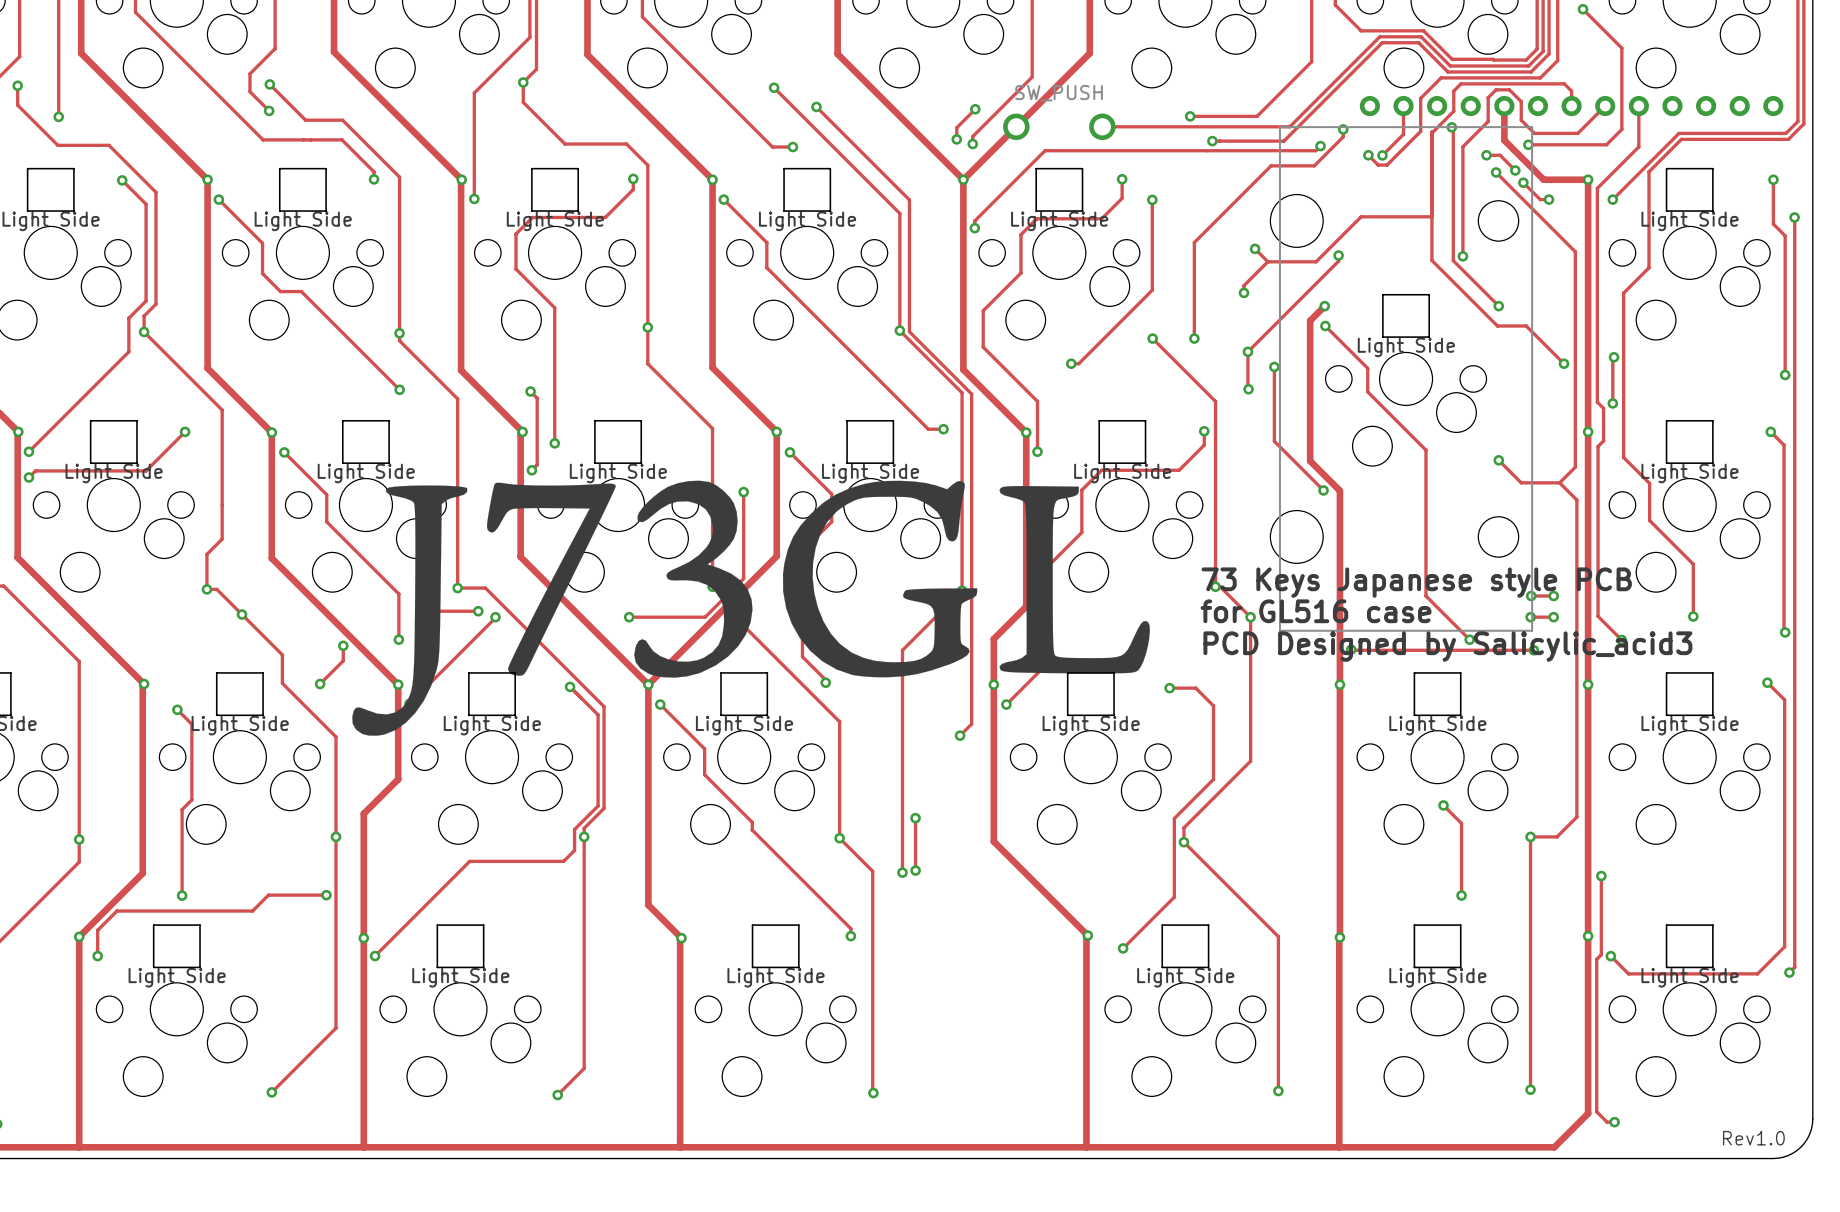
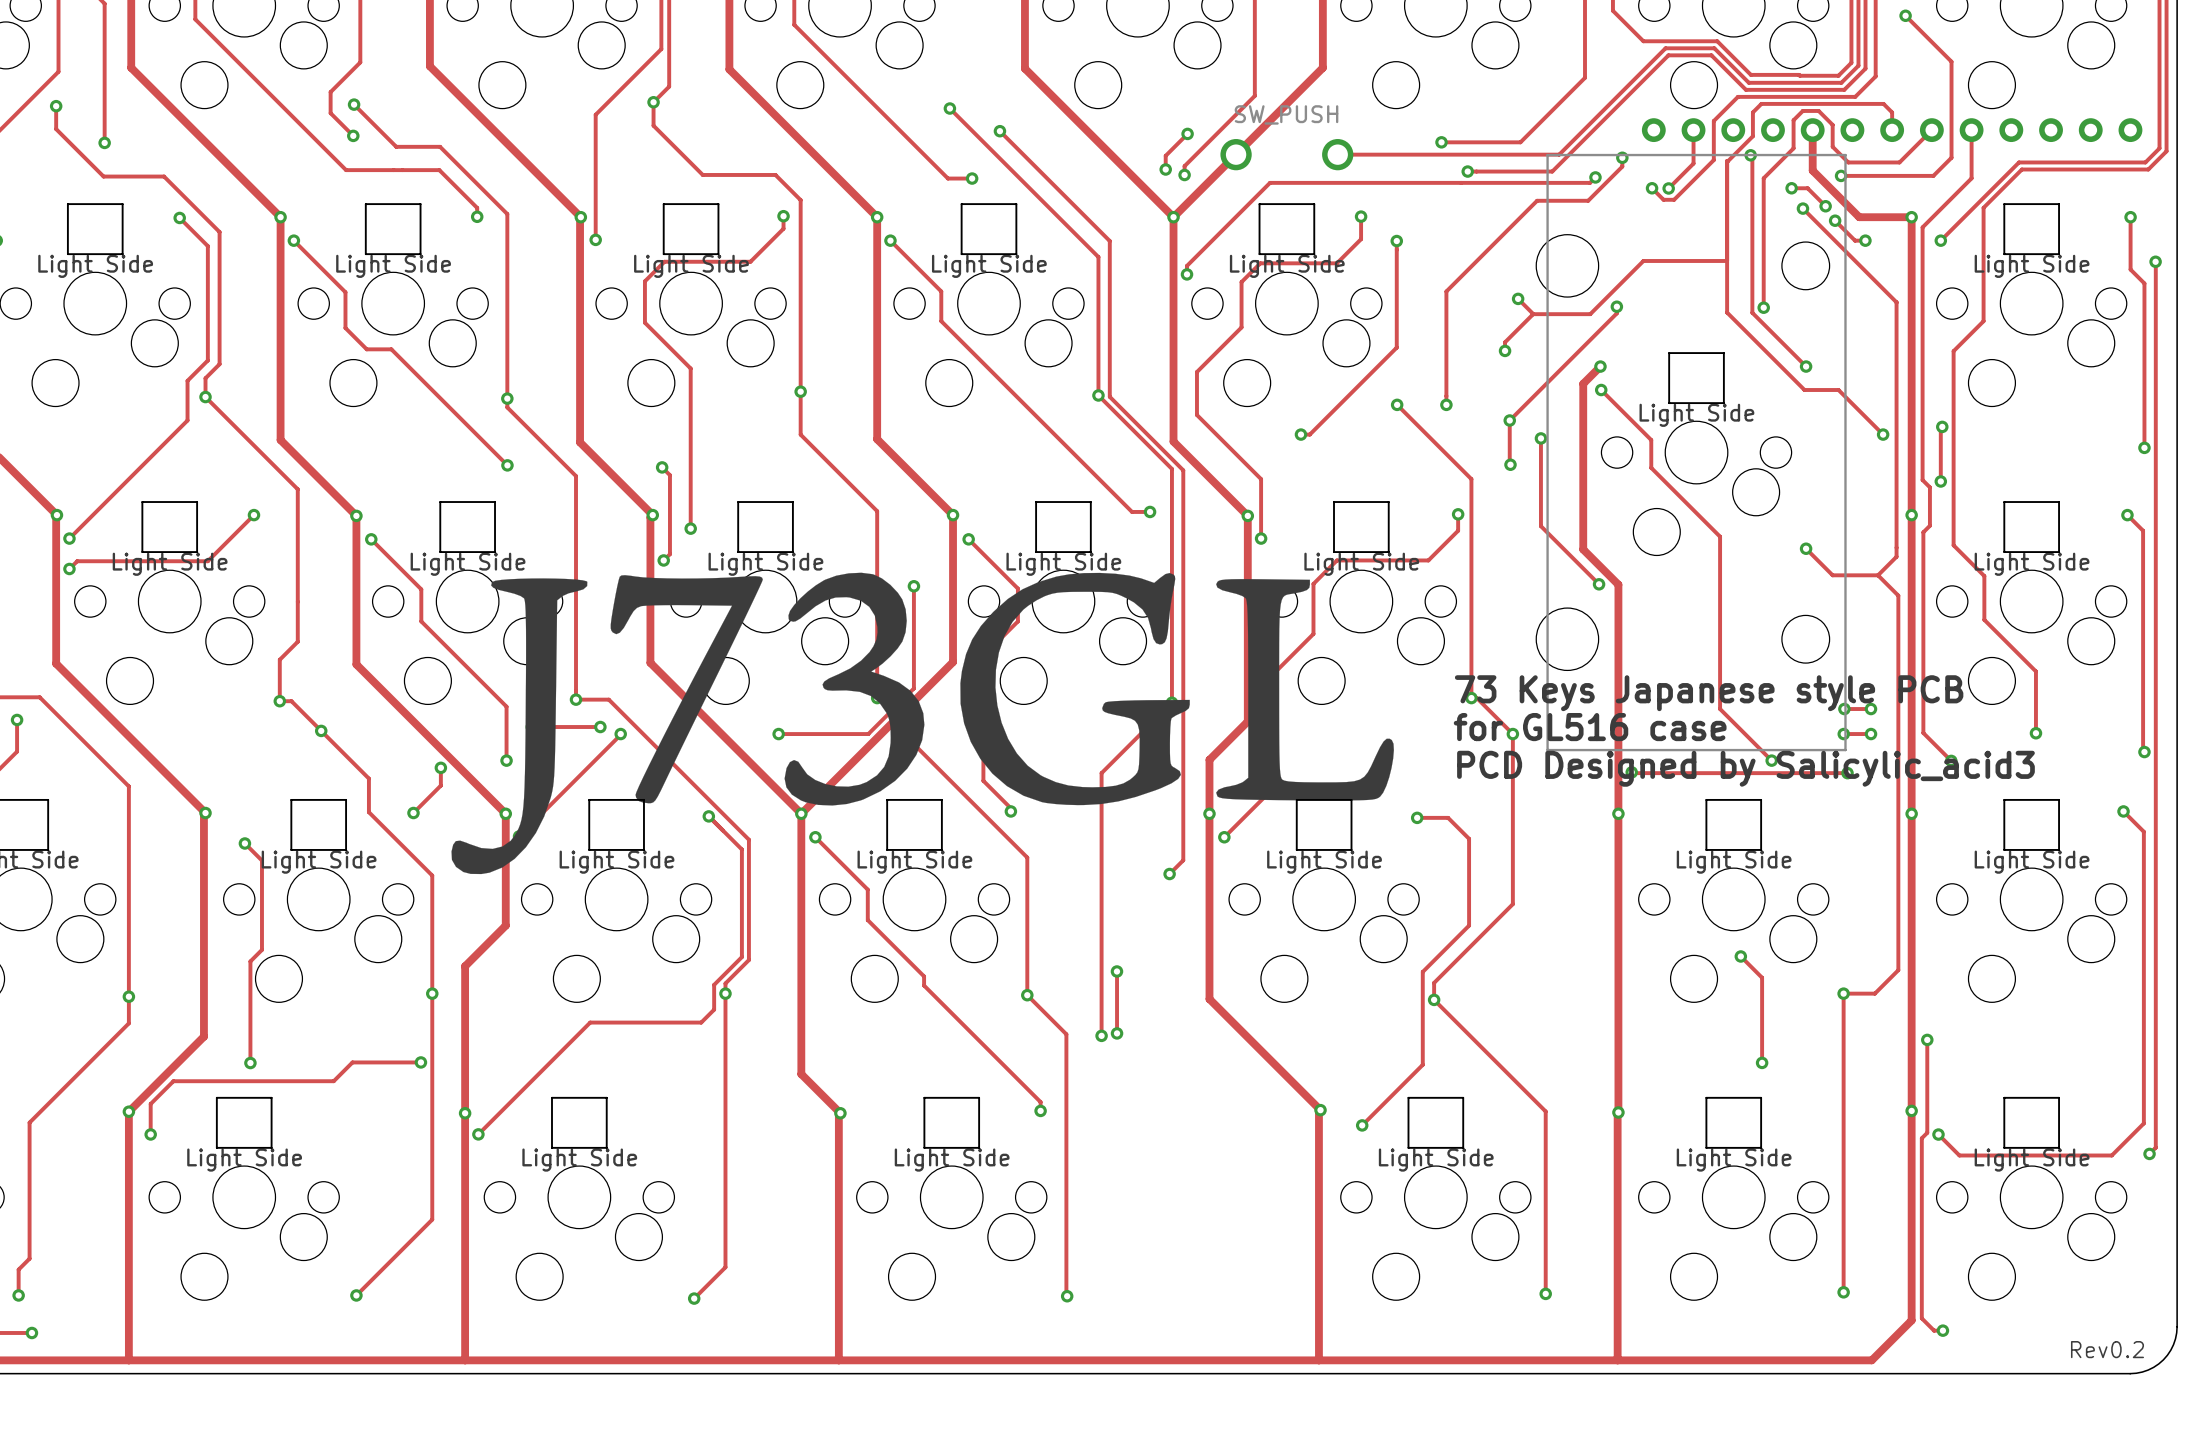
text: Rev1.0 (1753, 1138) -> Rev0.2 (2107, 1349)

